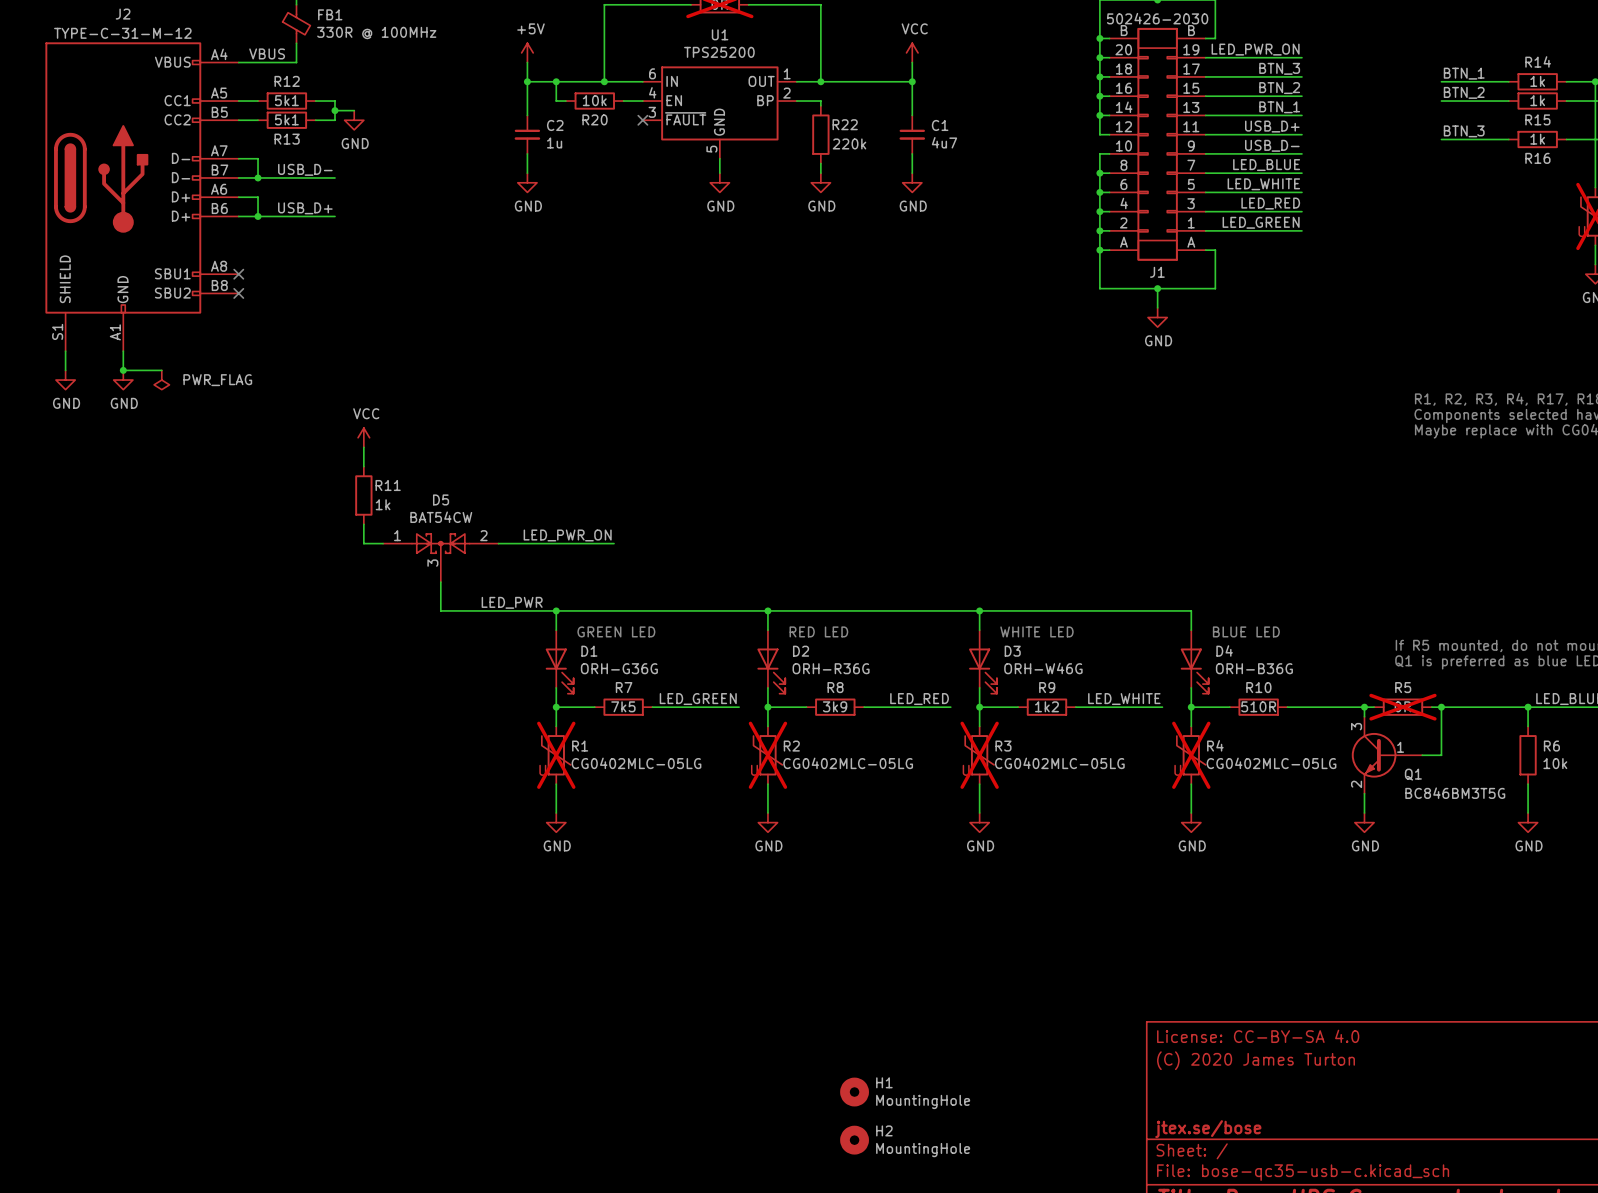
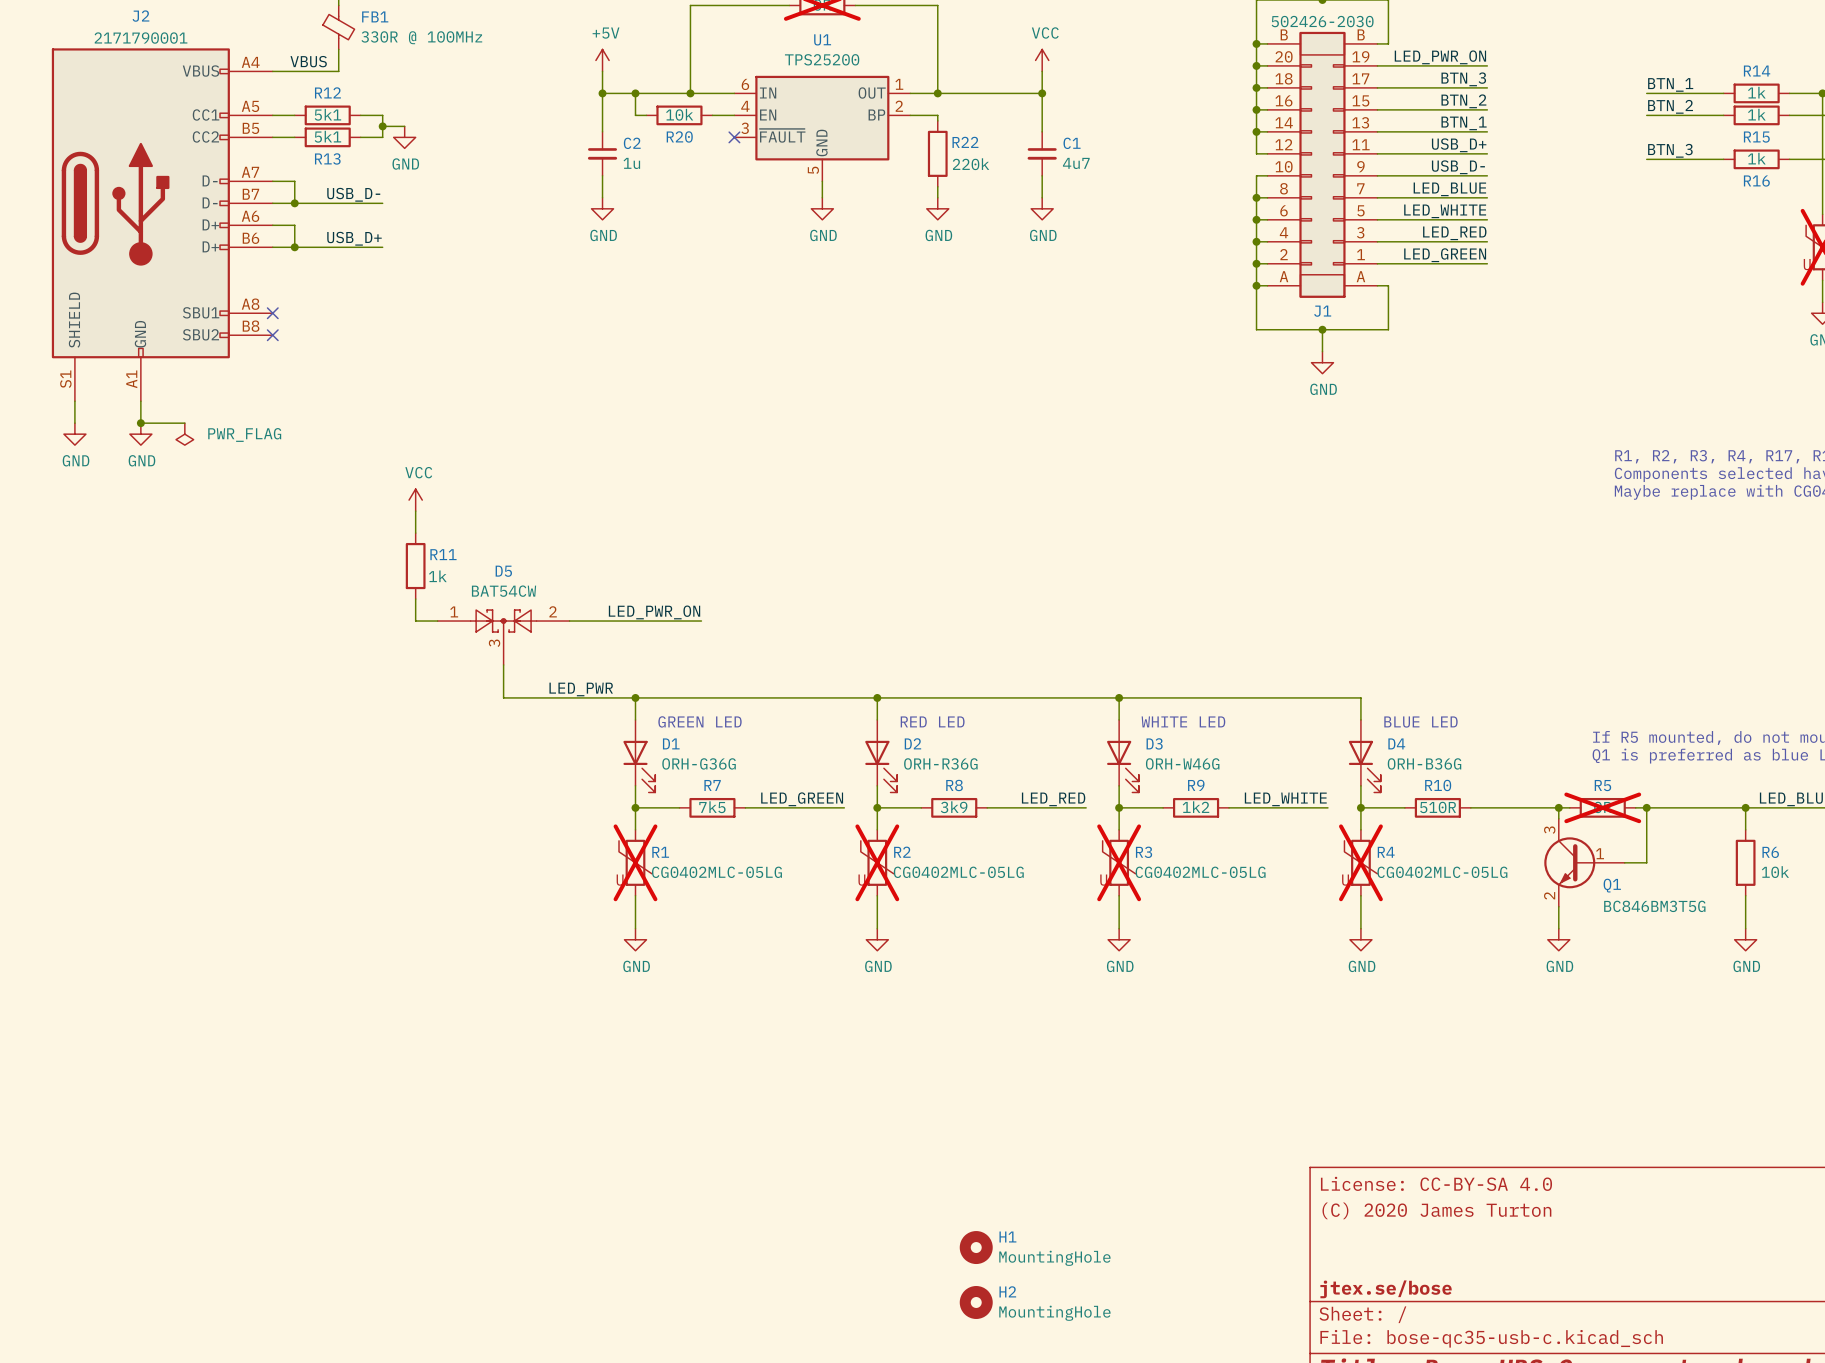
J2 value: TYPE-C-31-M-12 (122, 33) -> 2171790001 (141, 38)

